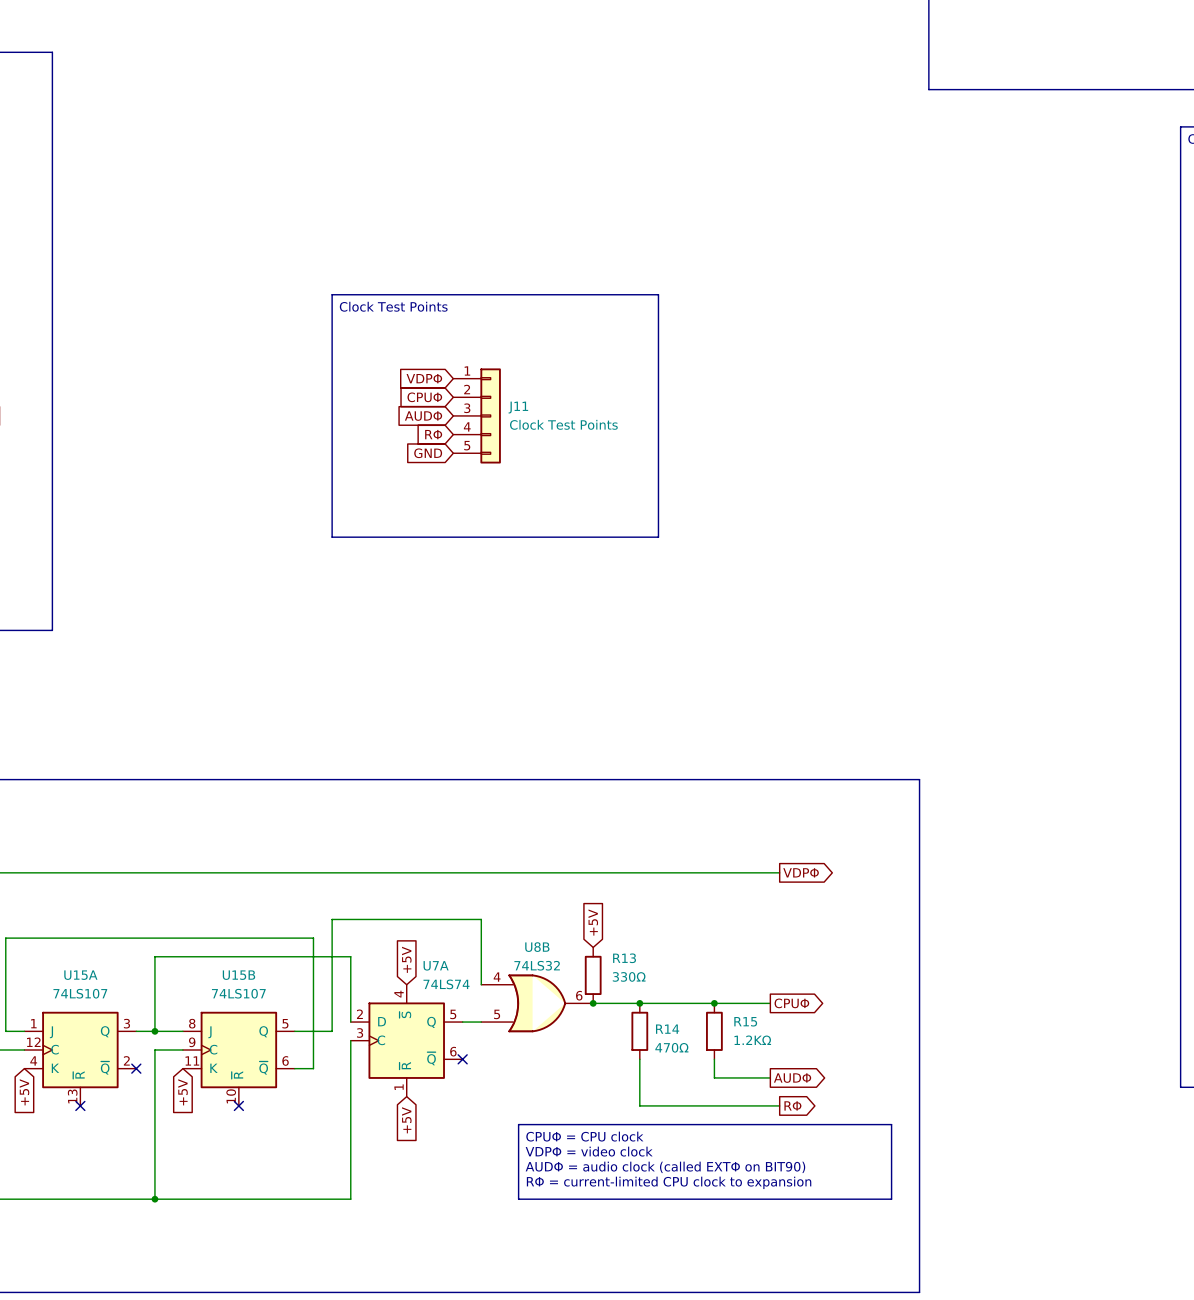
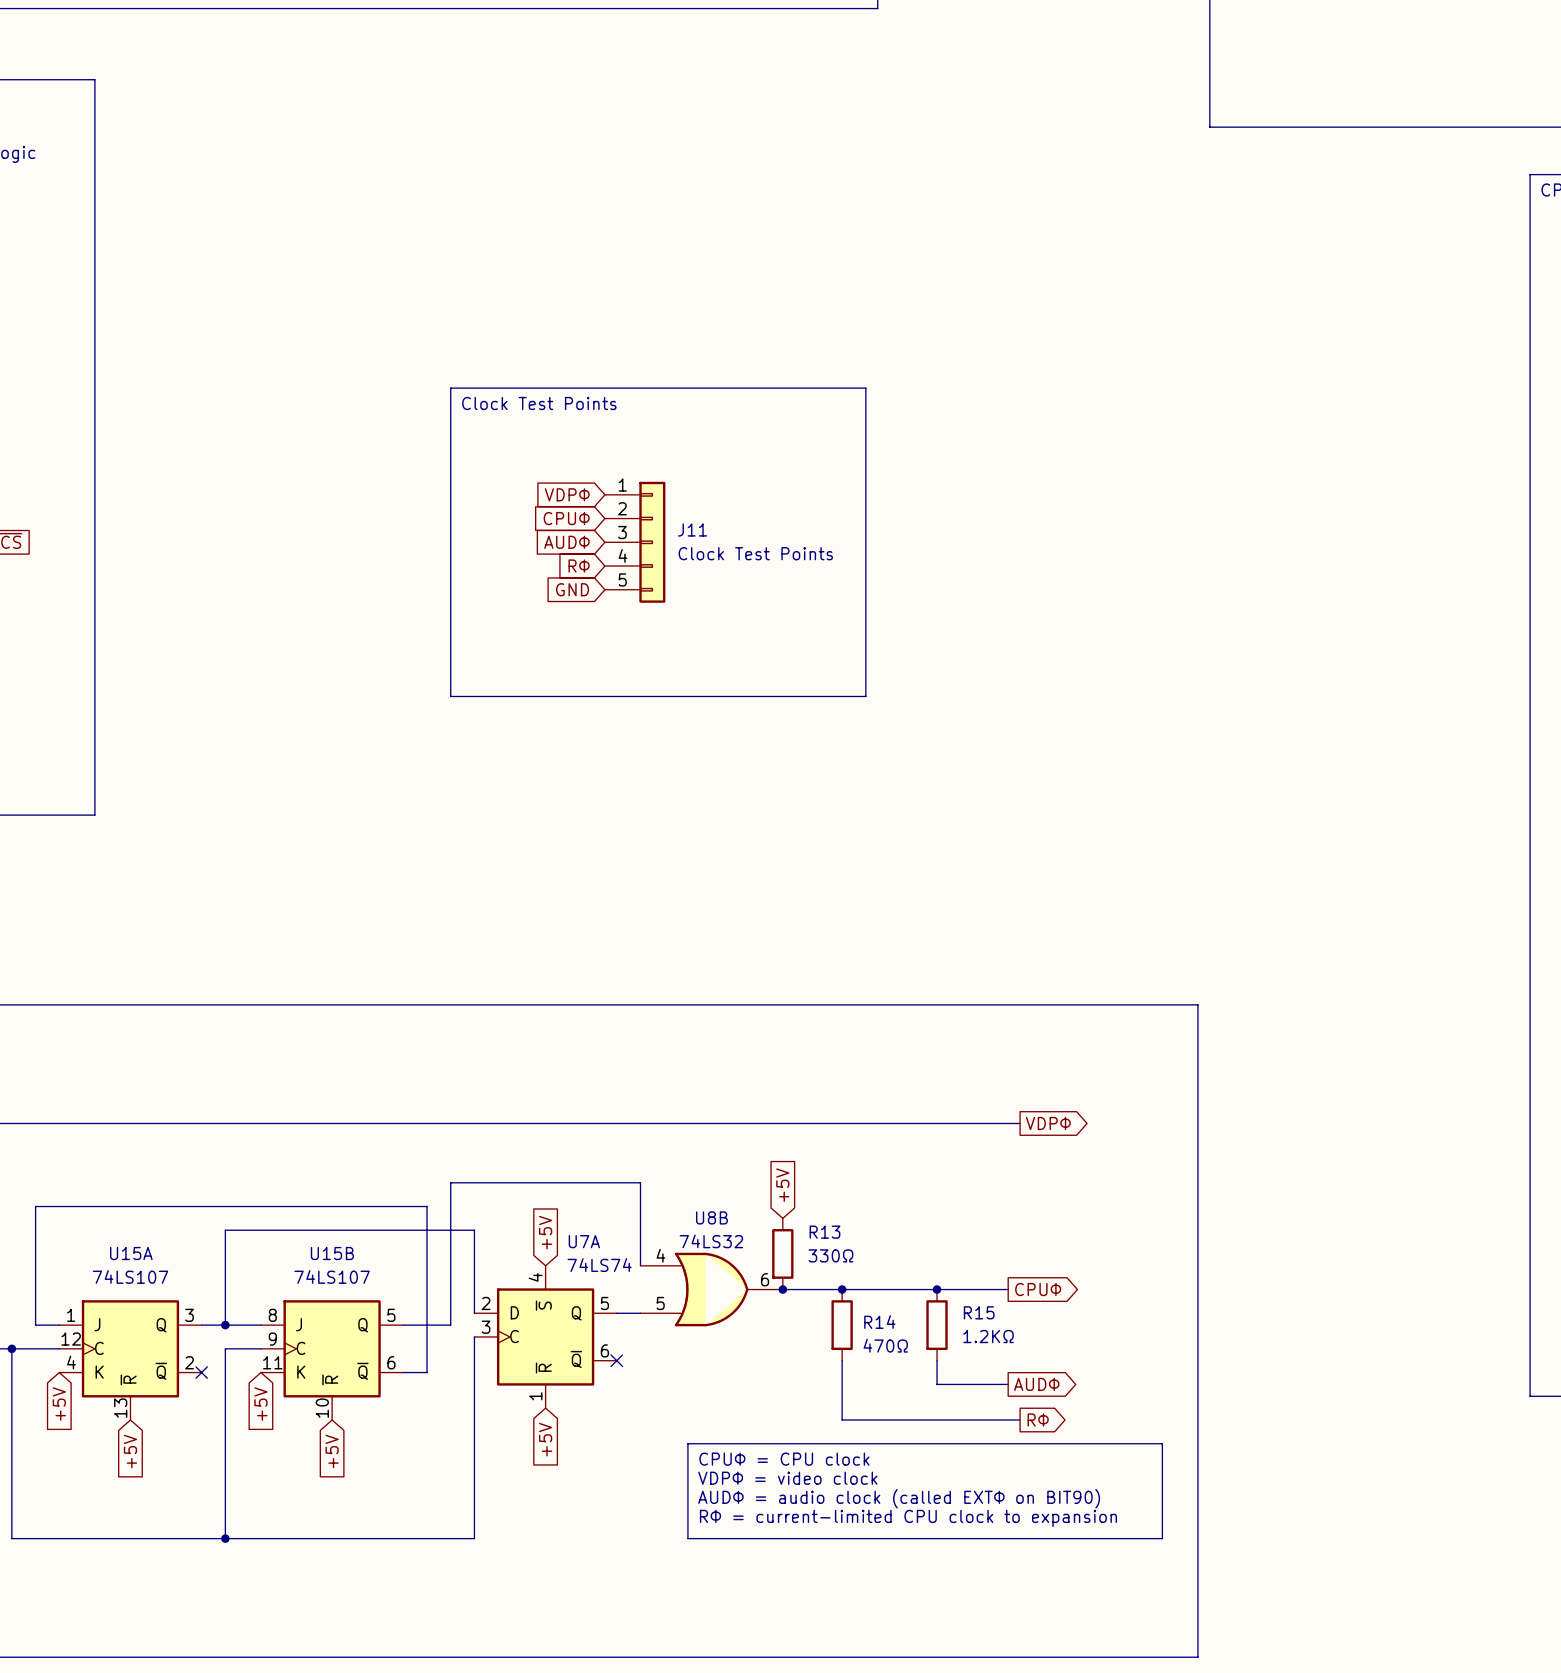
no-connect mark: (80, 1105) -> none
no-connect mark: (238, 1105) -> none
global label: none -> +5V (130, 1451)
global label: none -> +5V (332, 1451)

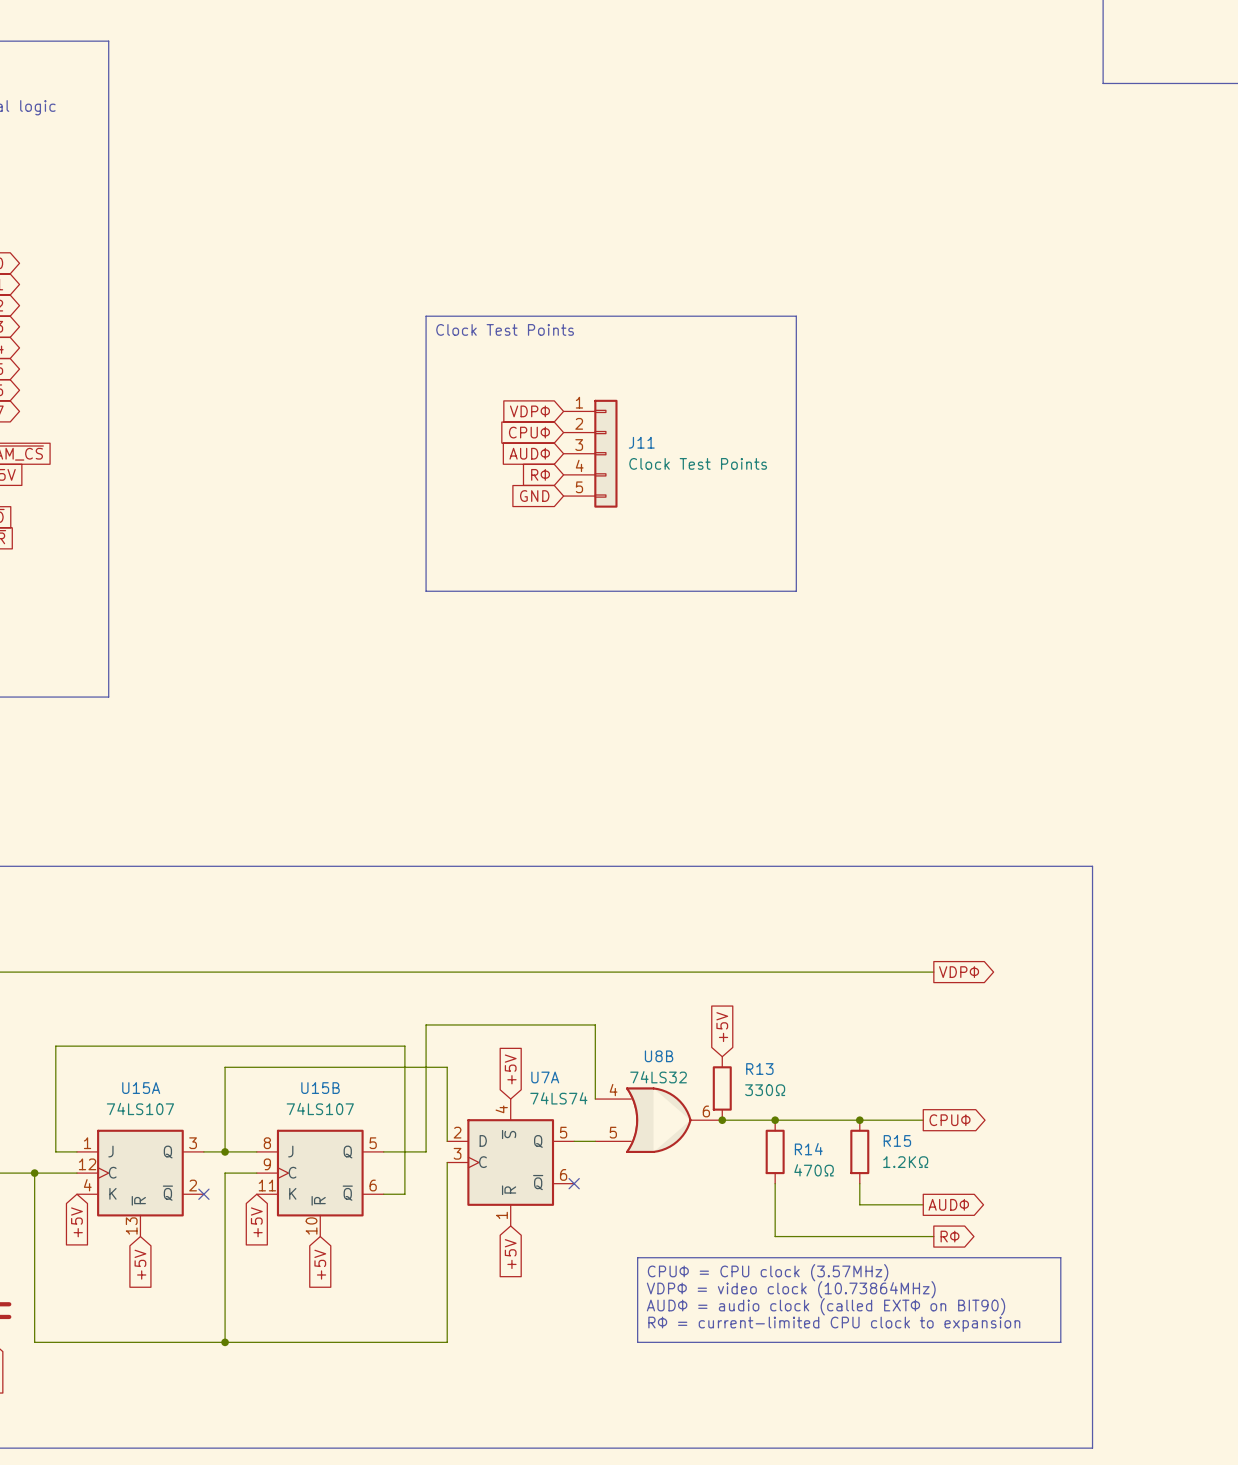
text: CPUΦ = CPU clock (784, 1459) -> CPUΦ = CPU clock (3.57MHz) (768, 1272)
text: VDPΦ = video clock (787, 1478) -> VDPΦ = video clock (10.73864MHz) (791, 1289)

